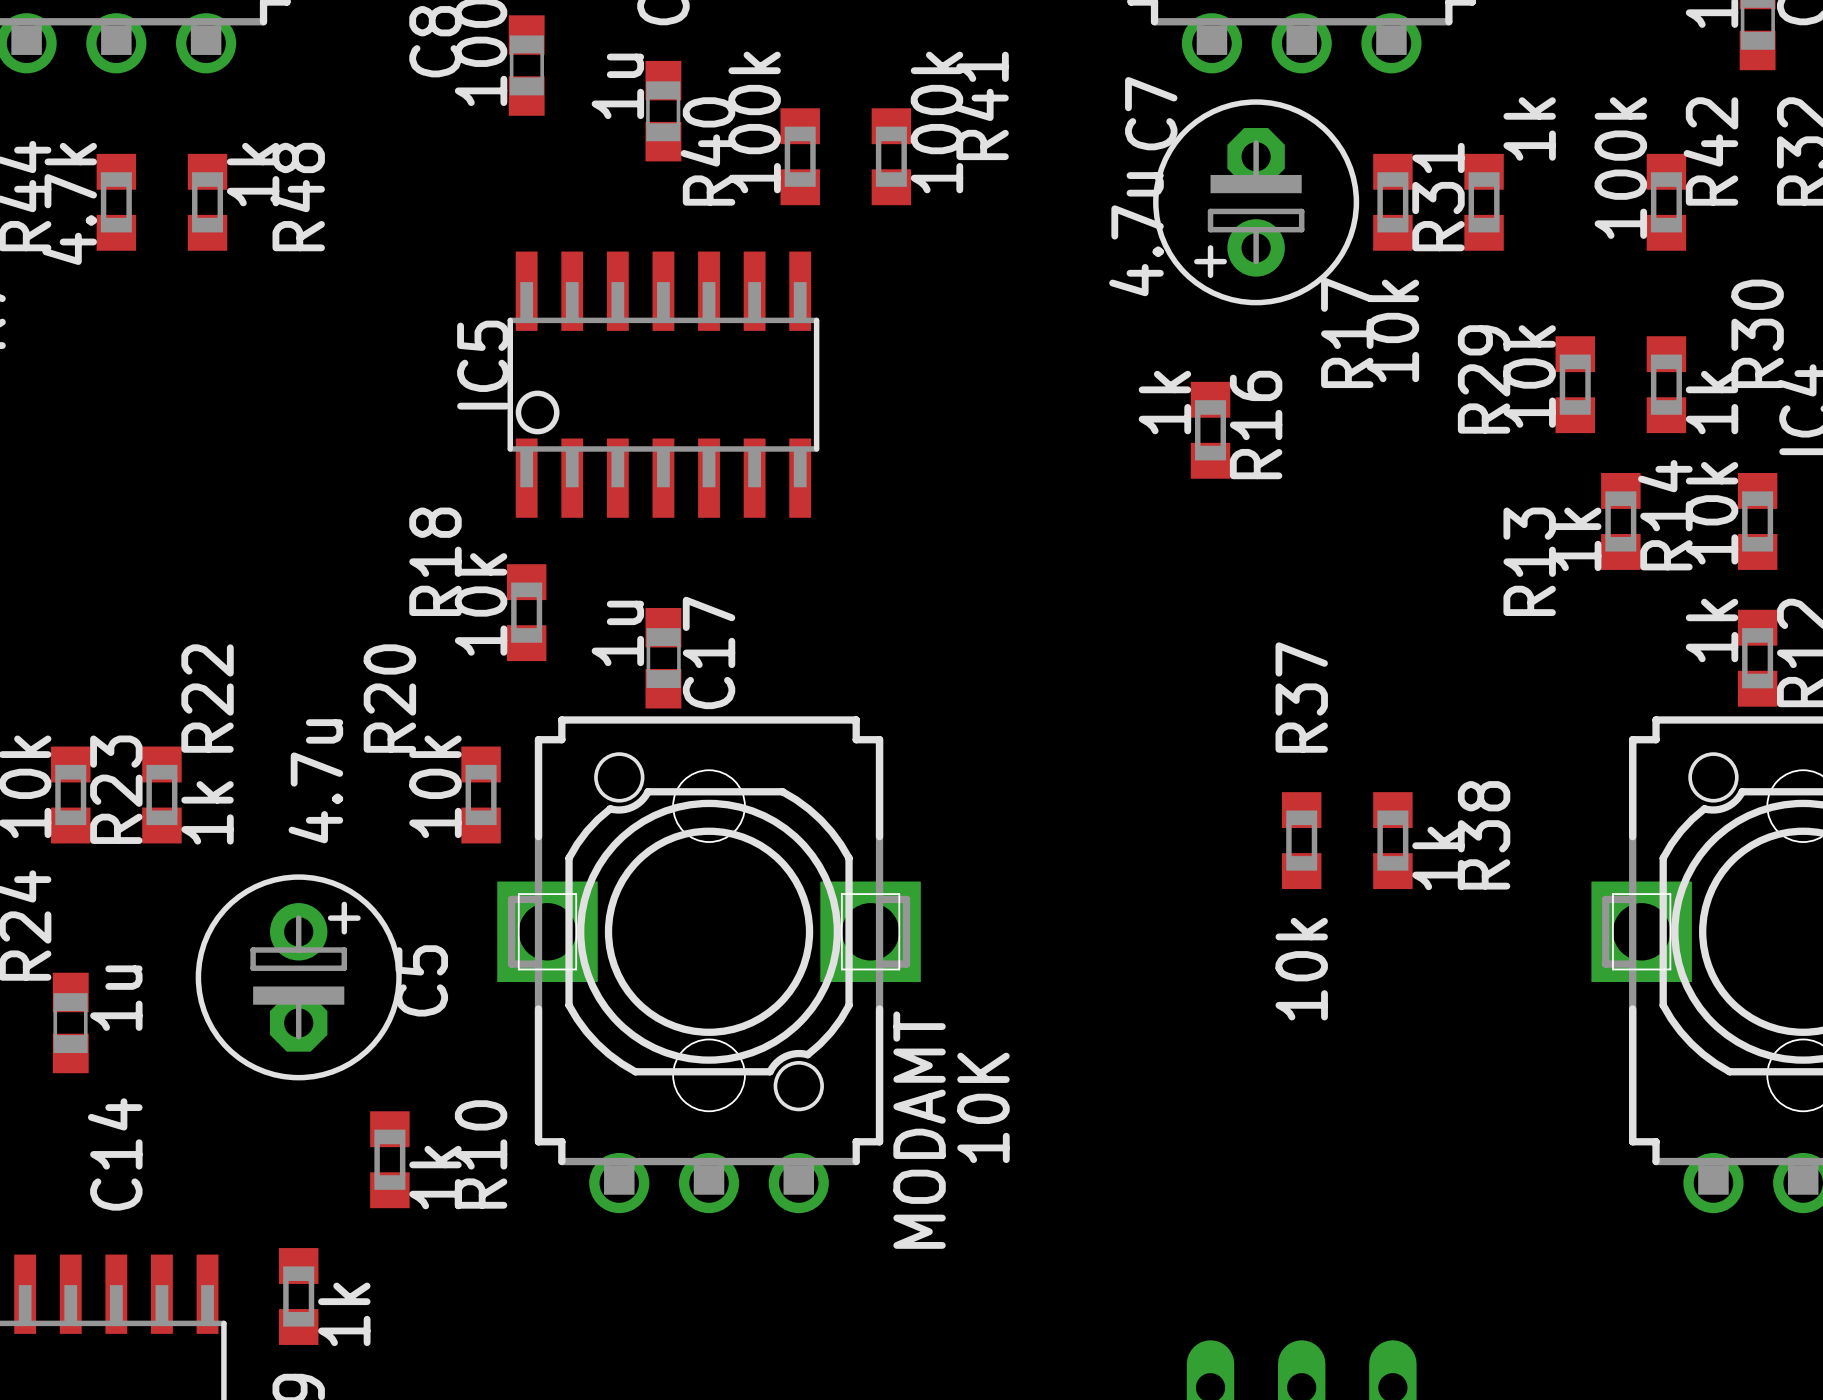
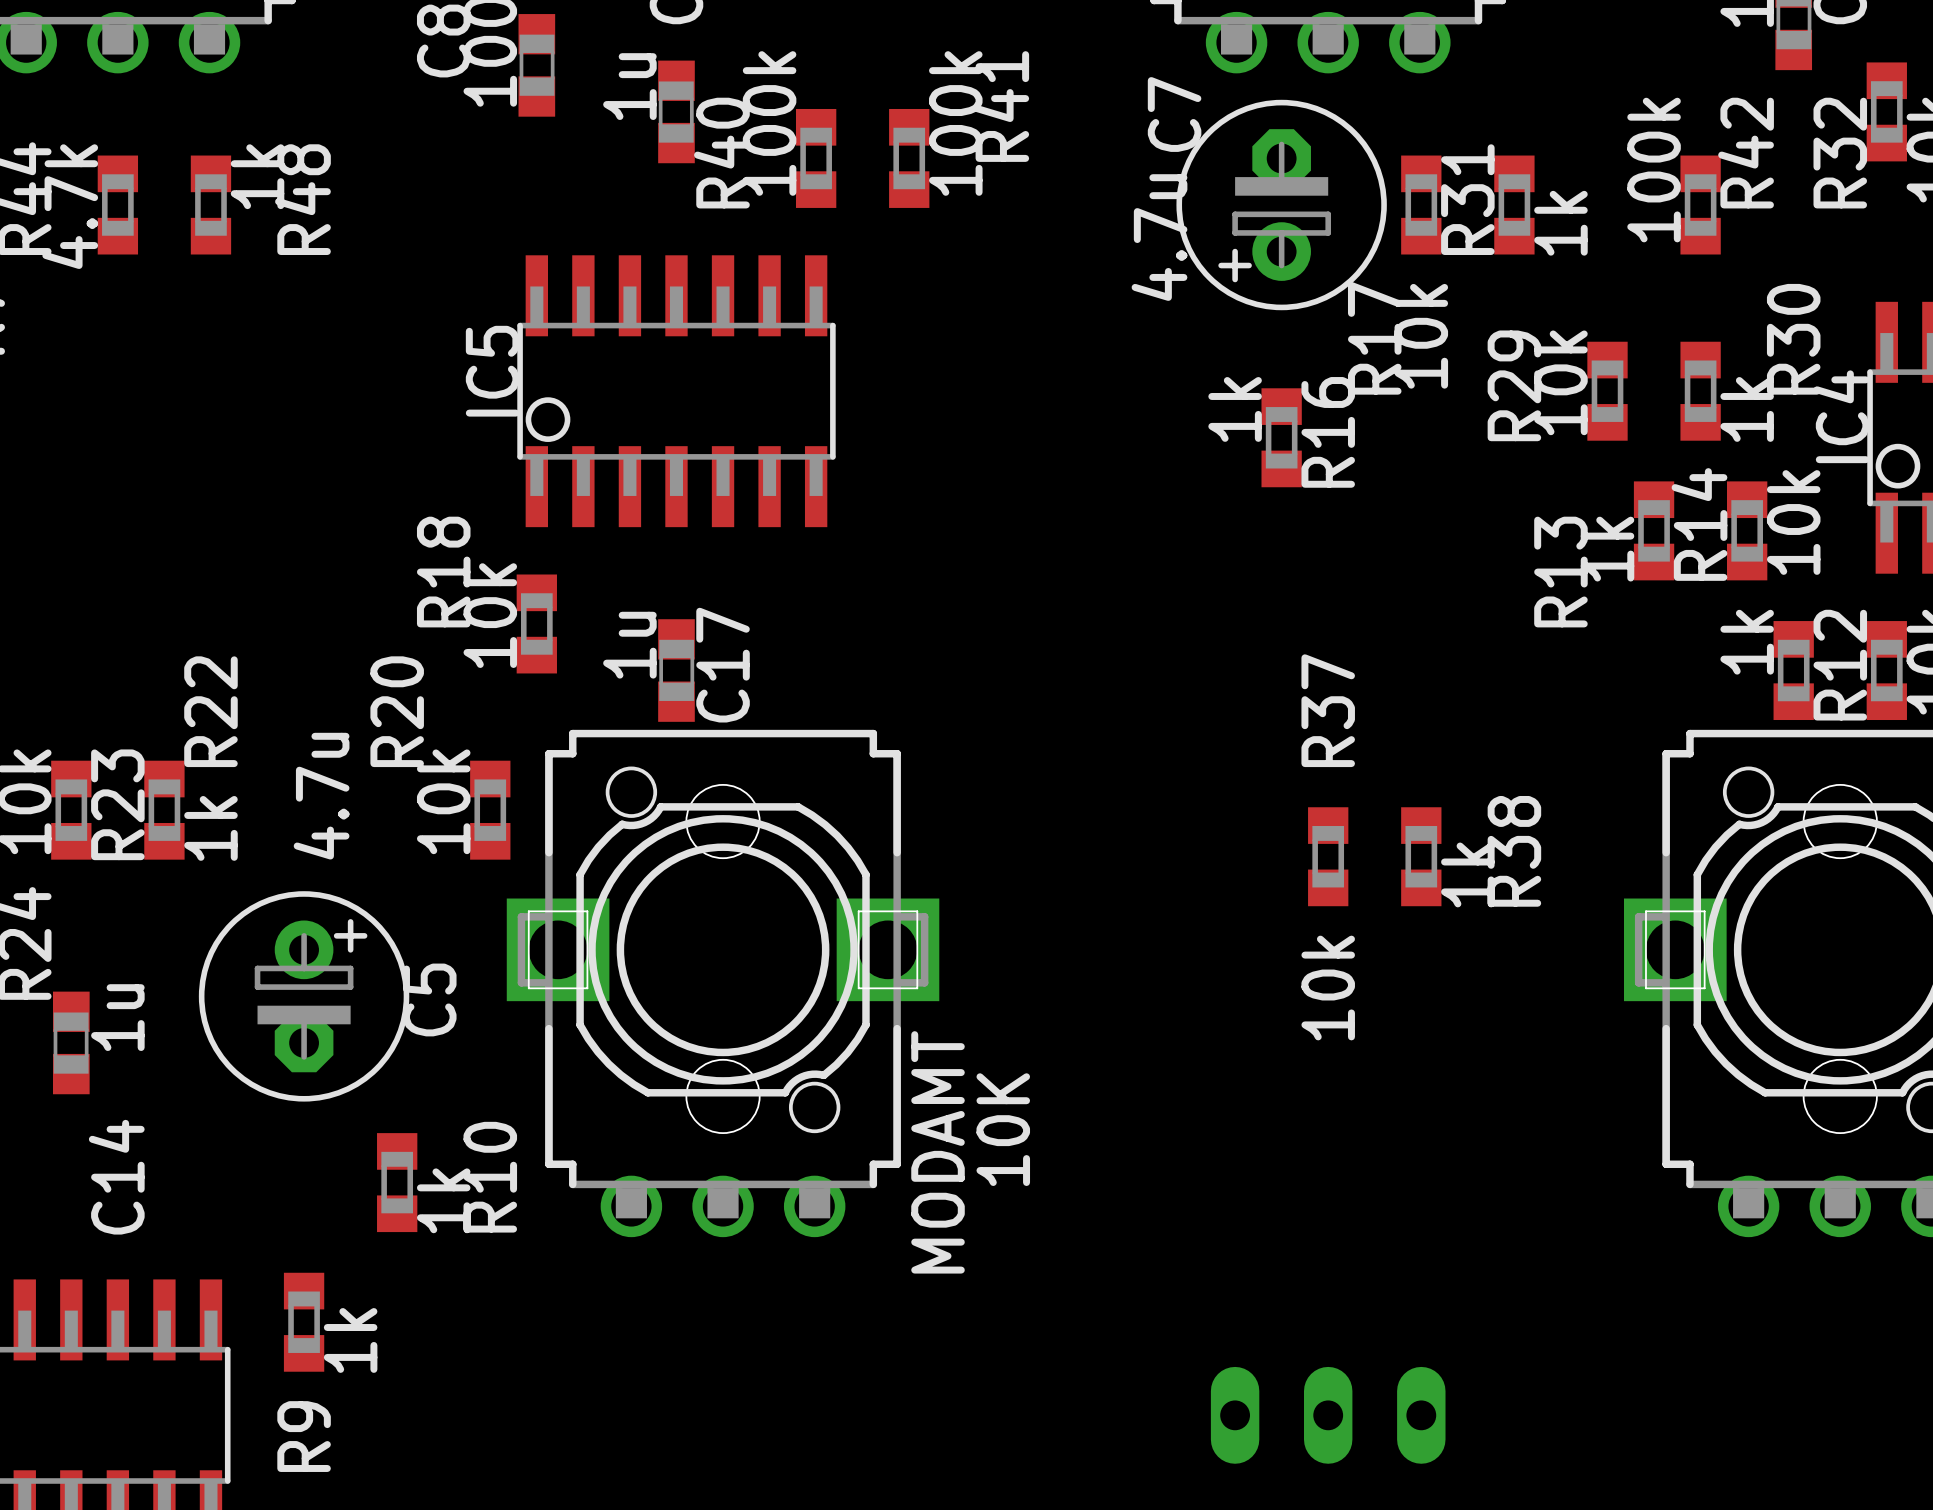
R31 value position: 1k (1529, 128) -> 1k (1560, 223)
R16 position: (1210, 430) -> (1281, 437)
R14 value position: 10k (1712, 513) -> 10k (1793, 522)
R14 position: (1757, 521) -> (1747, 530)

